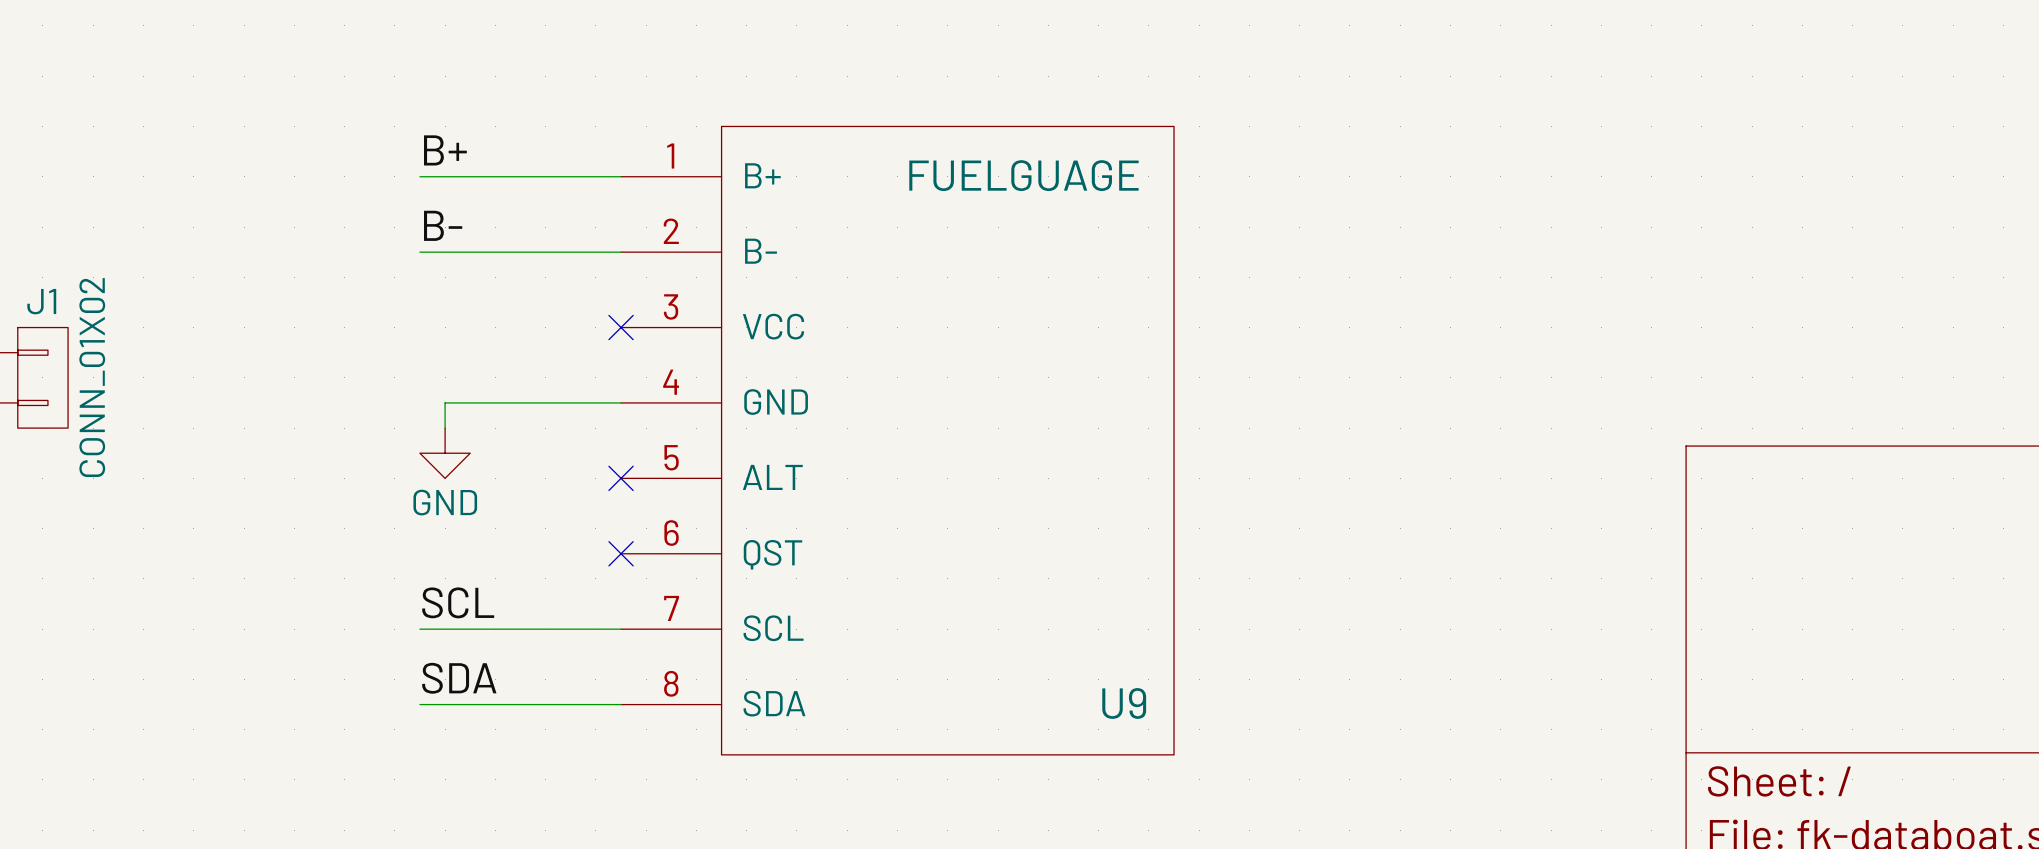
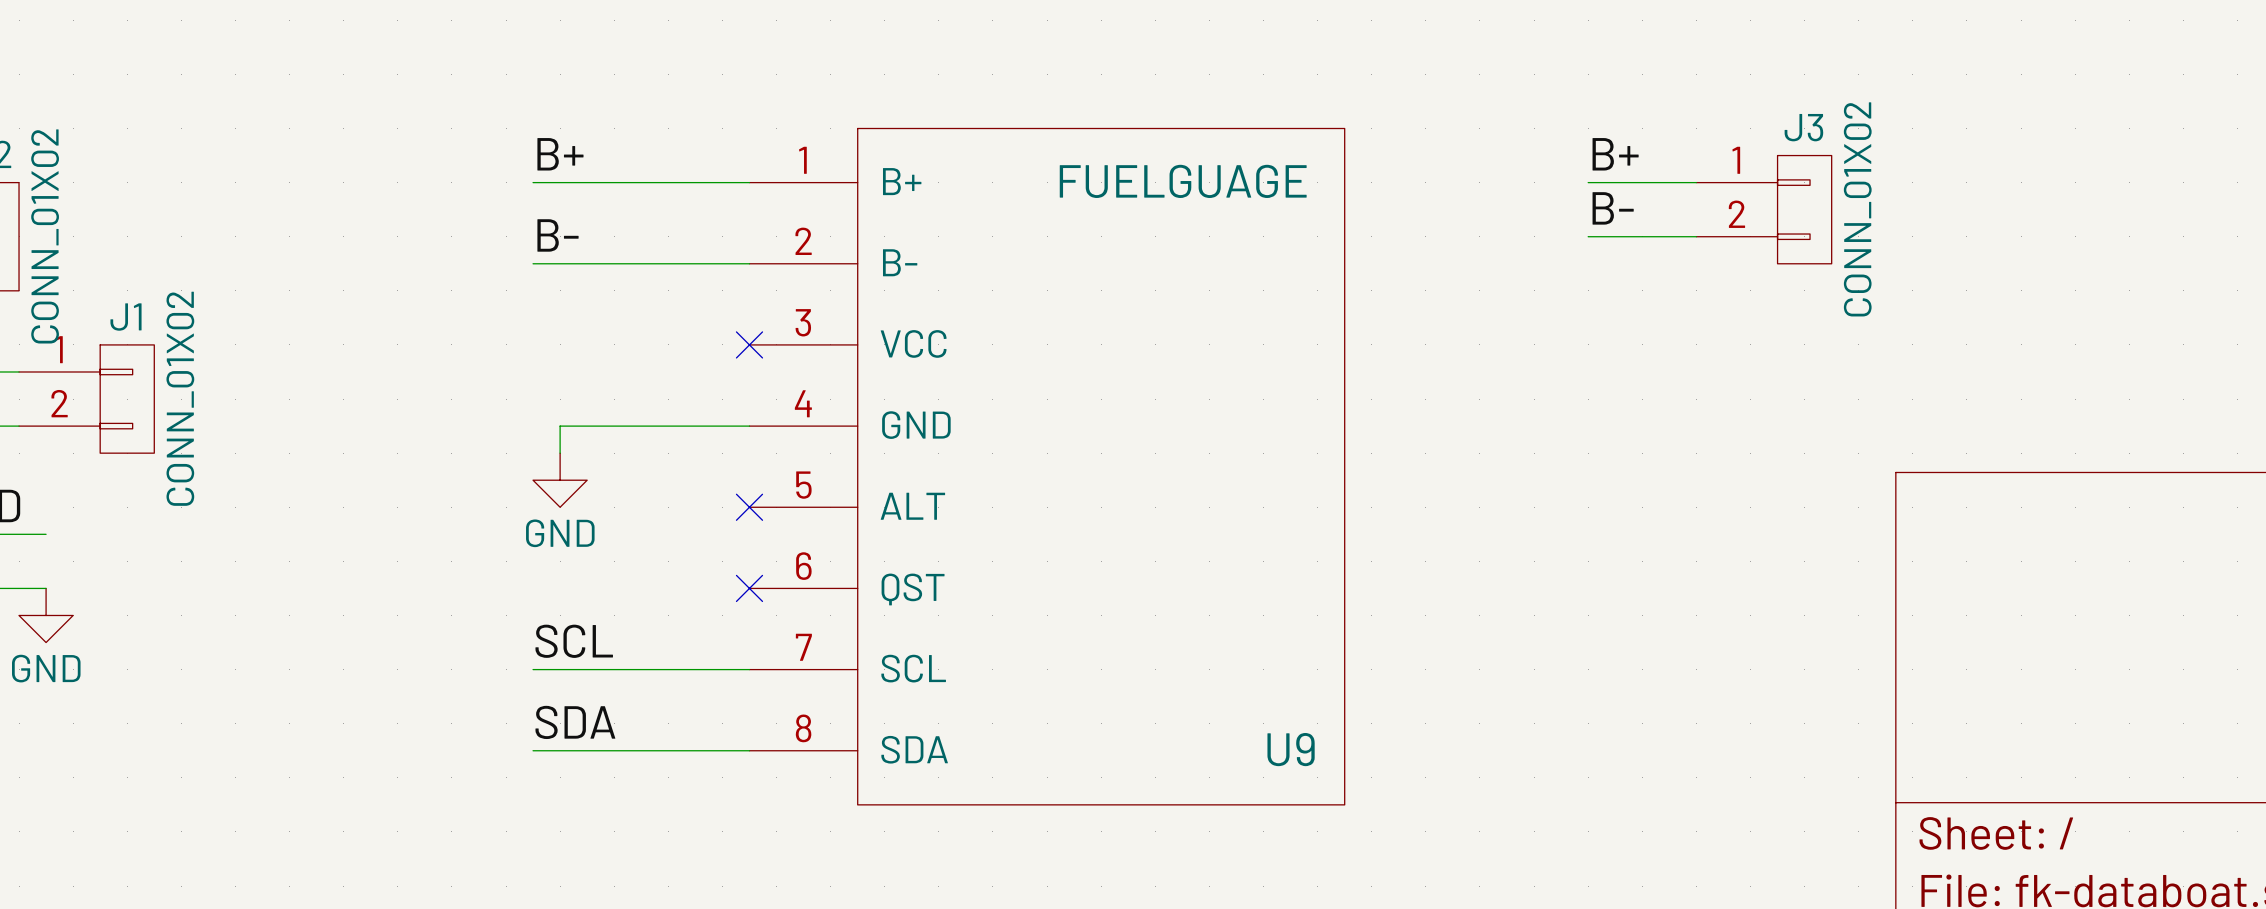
label: none -> B+ (1615, 154)
wire: none -> (1588, 182) (1696, 182)
label: none -> B- (1613, 208)
J3: none -> CONN_01X02 (1764, 209)
wire: none -> (1588, 236) (1696, 236)

